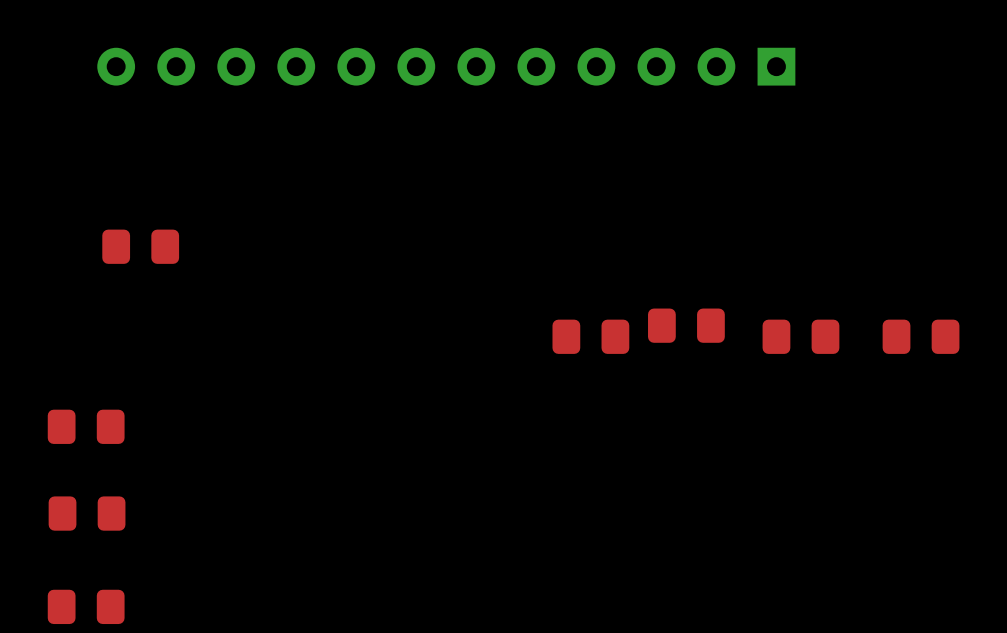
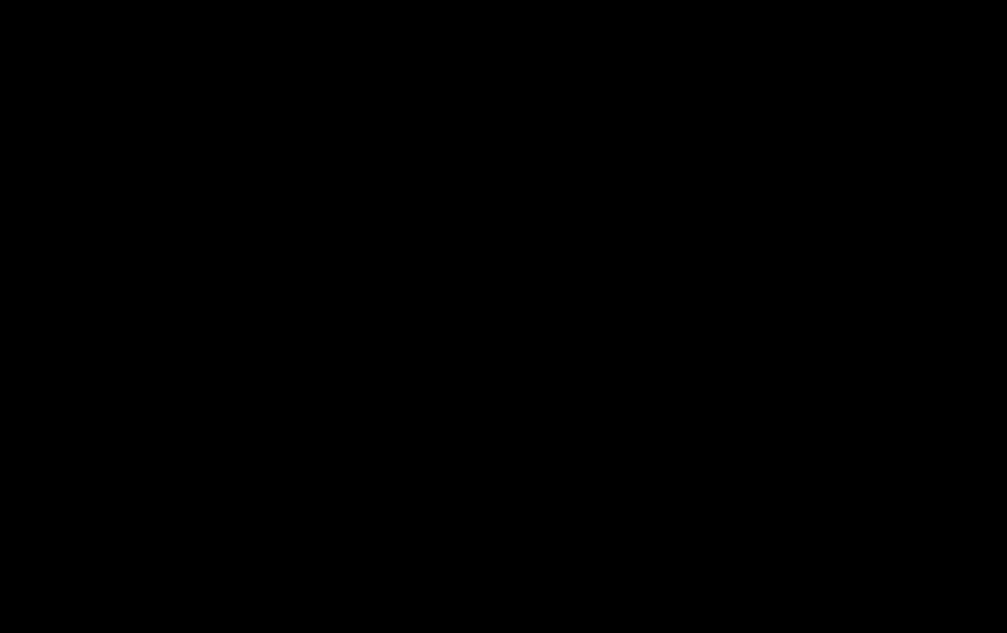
part: (446, 66) -> none
part: (140, 246) -> none
part: (686, 325) -> none
part: (590, 336) -> none
part: (800, 336) -> none
part: (921, 336) -> none
part: (86, 426) -> none
part: (87, 513) -> none
part: (86, 606) -> none

